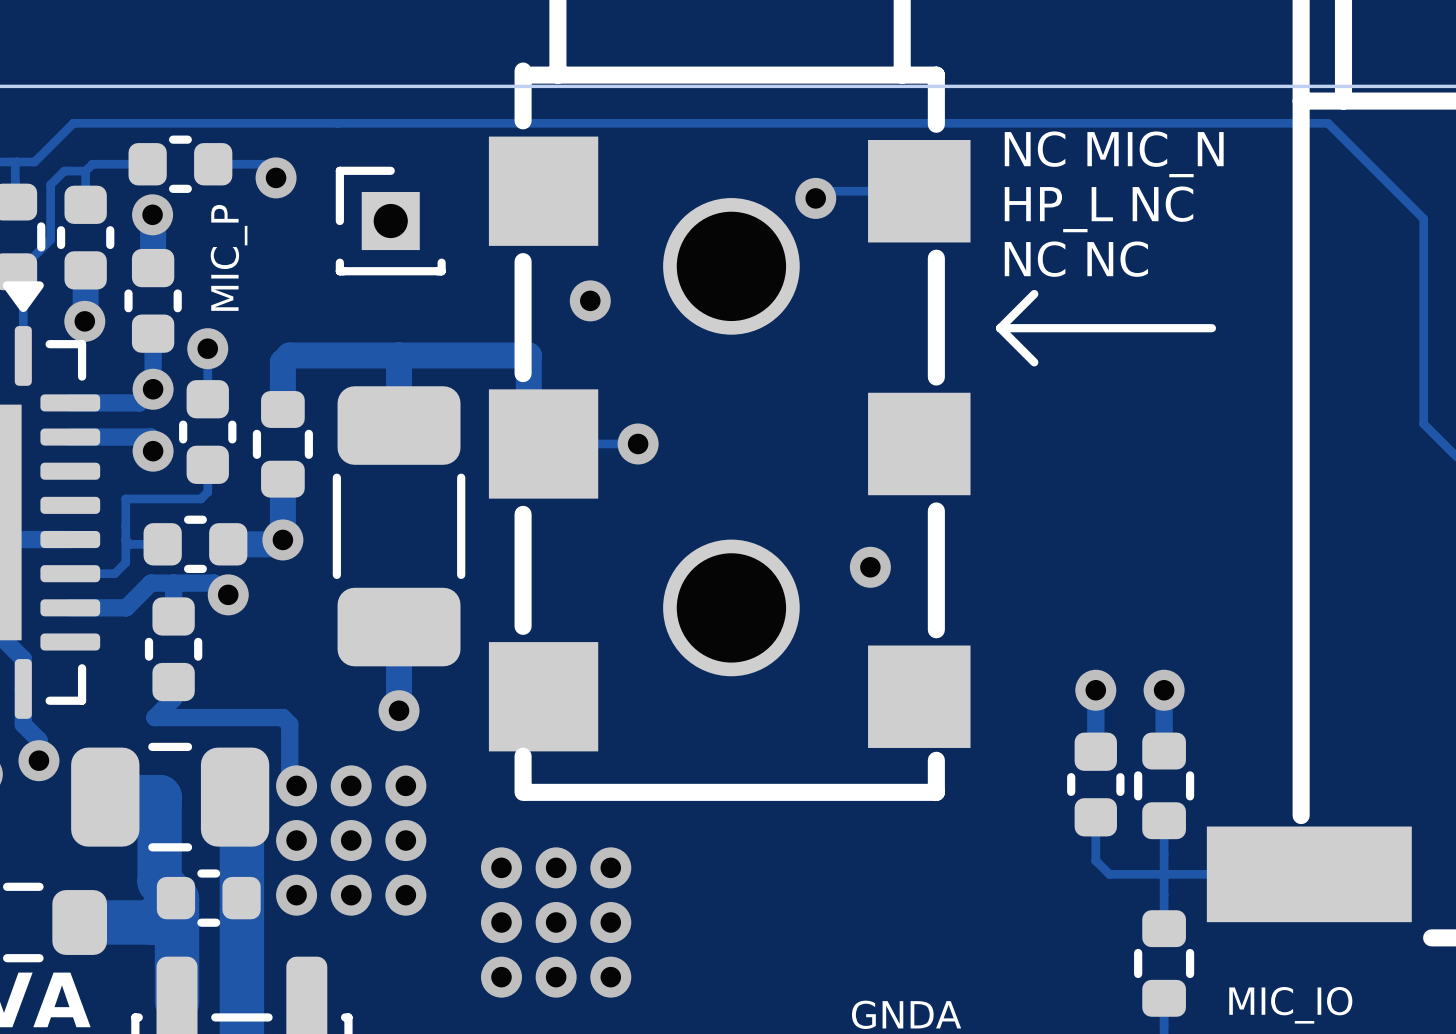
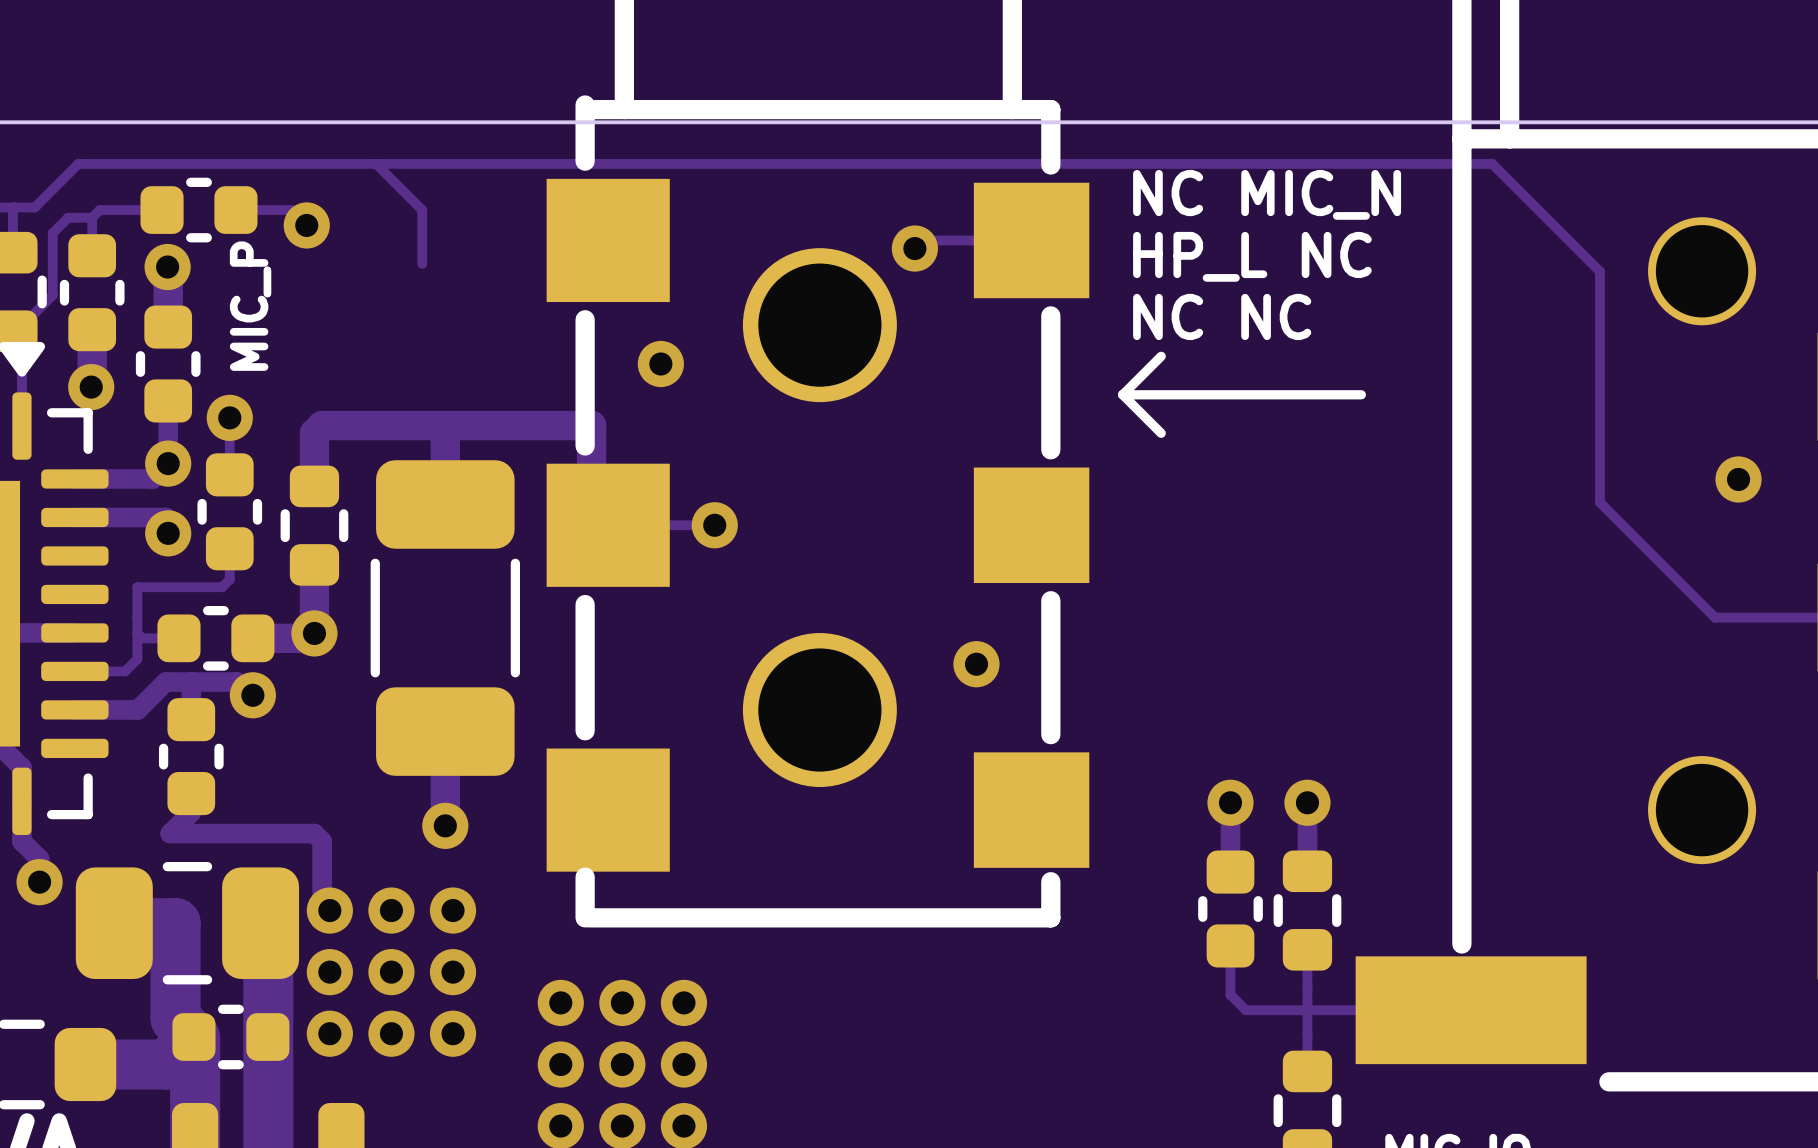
track: none -> (376, 163) (422, 210) (422, 263)
part: (390, 221) -> none

